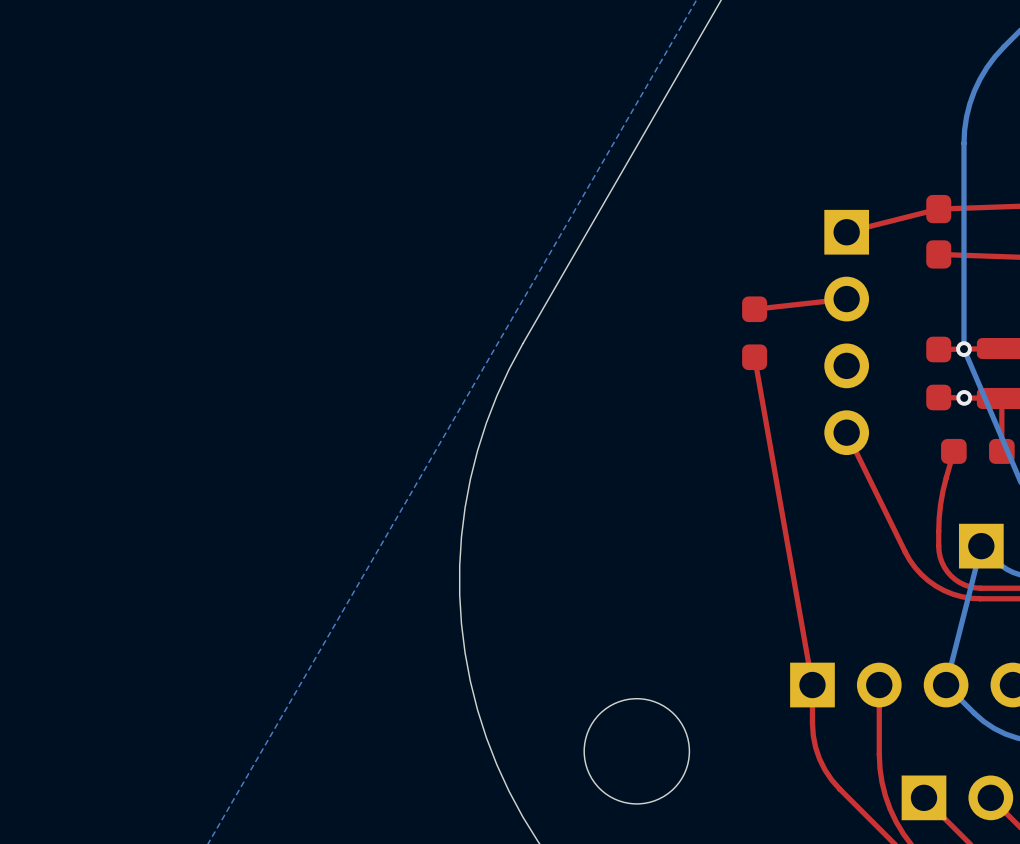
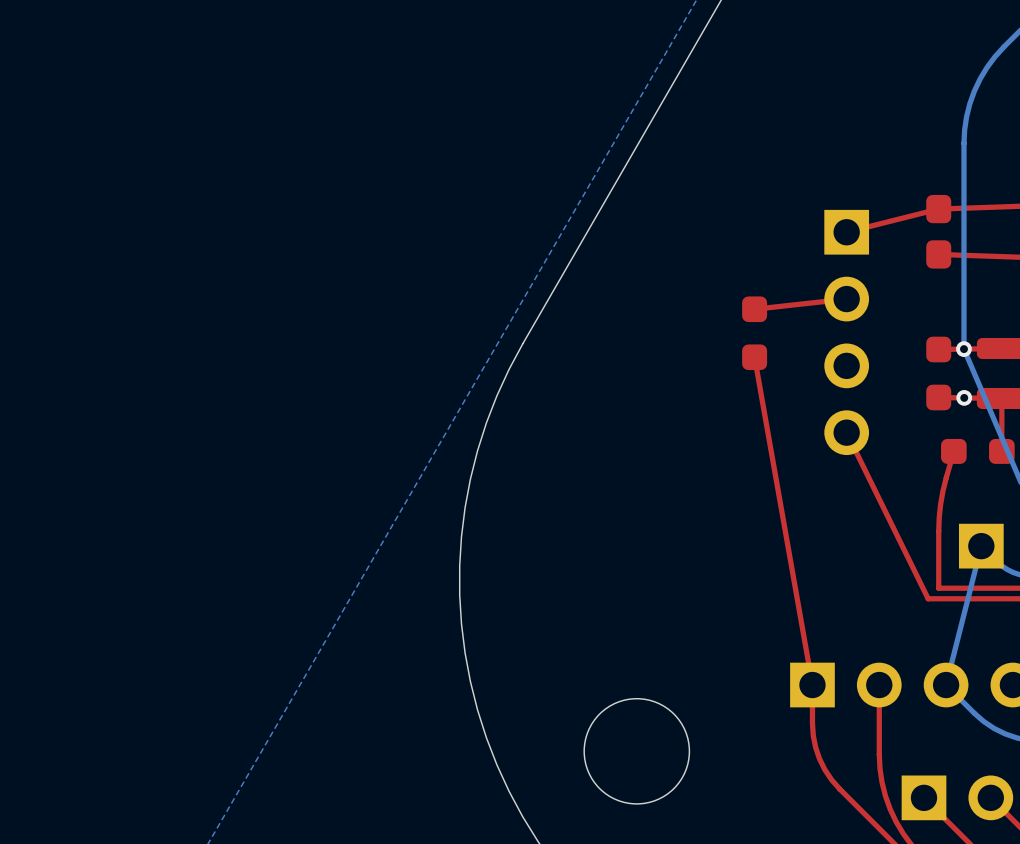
top track: (938, 546) (941, 562) (951, 575) (964, 585) (980, 588) -> (938, 546) (938, 588) (980, 588)
top track: (905, 552) (921, 574) (936, 586) (952, 594) (980, 598) -> (905, 552) (928, 598) (980, 598)

